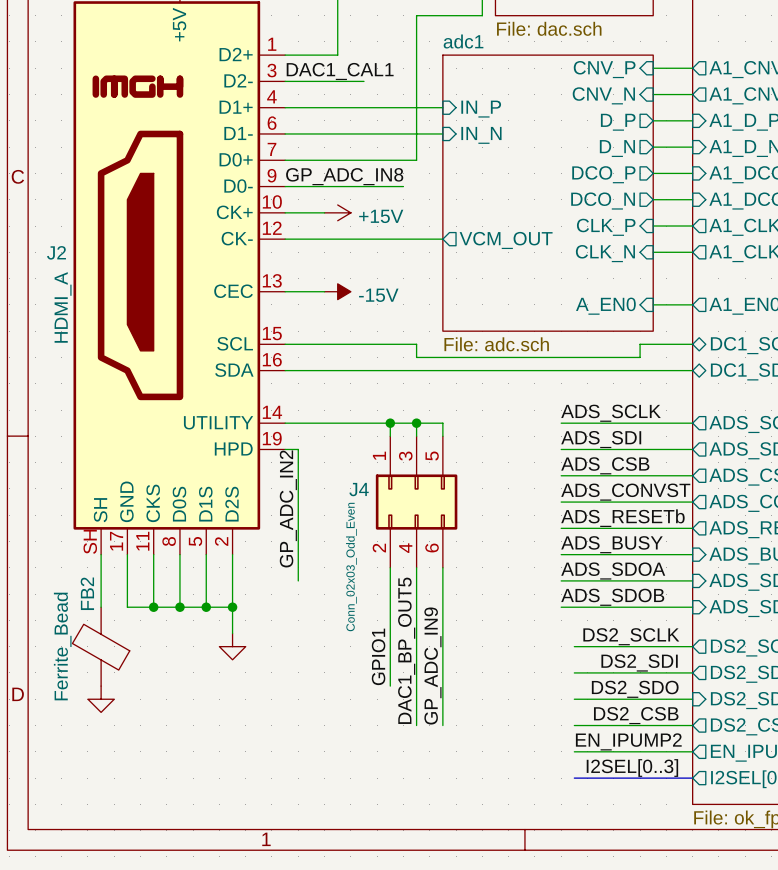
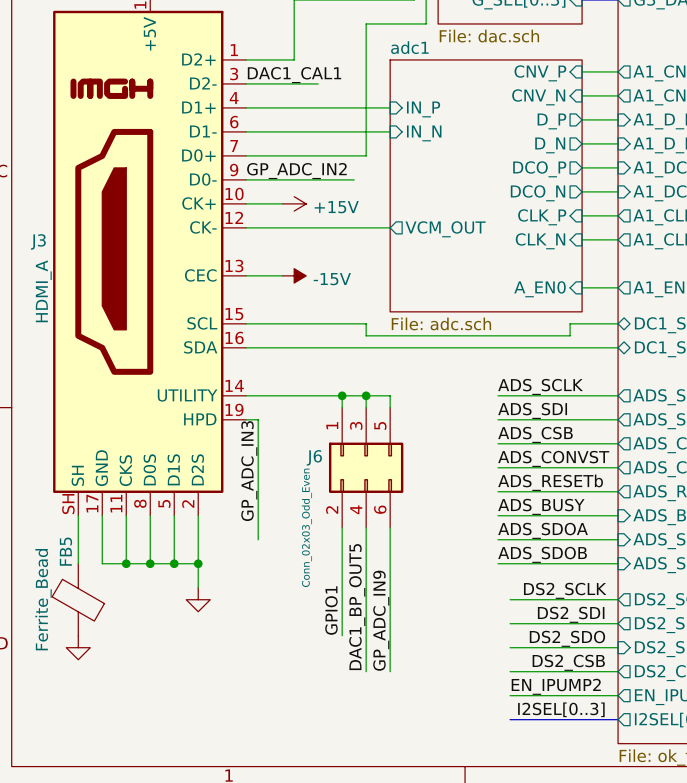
label: GP_ADC_IN8 (344, 176) -> GP_ADC_IN2 (296, 171)
J2 name: J2 (56, 252) -> J3 (38, 241)
J4 name: J4 (359, 489) -> J6 (314, 457)
label: GP_ADC_IN2 (288, 508) -> GP_ADC_IN3 (249, 471)
FB2 name: FB2 (87, 593) -> FB5 (65, 551)

